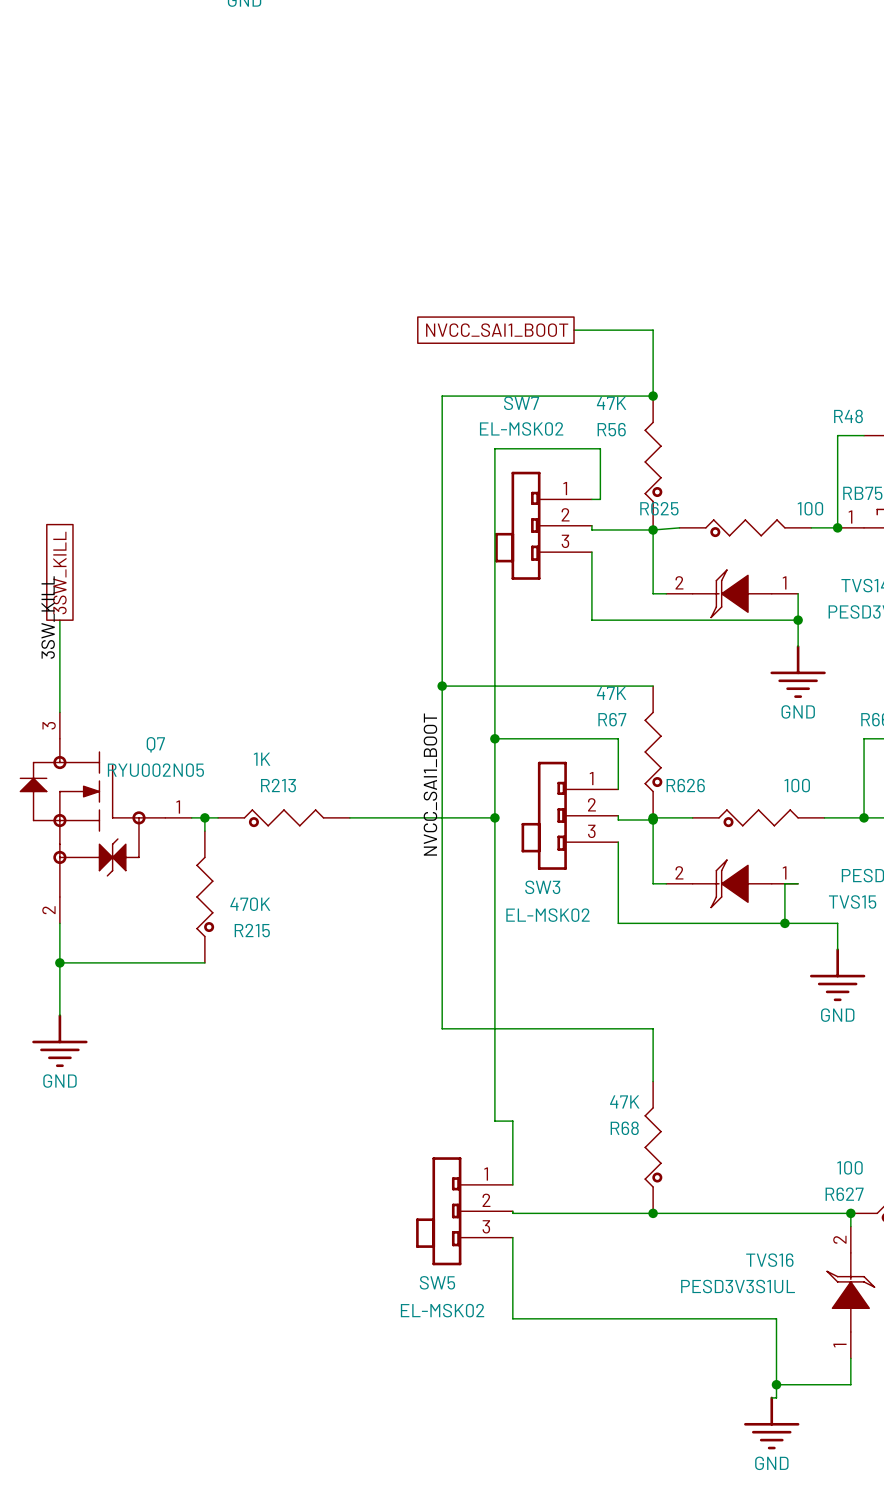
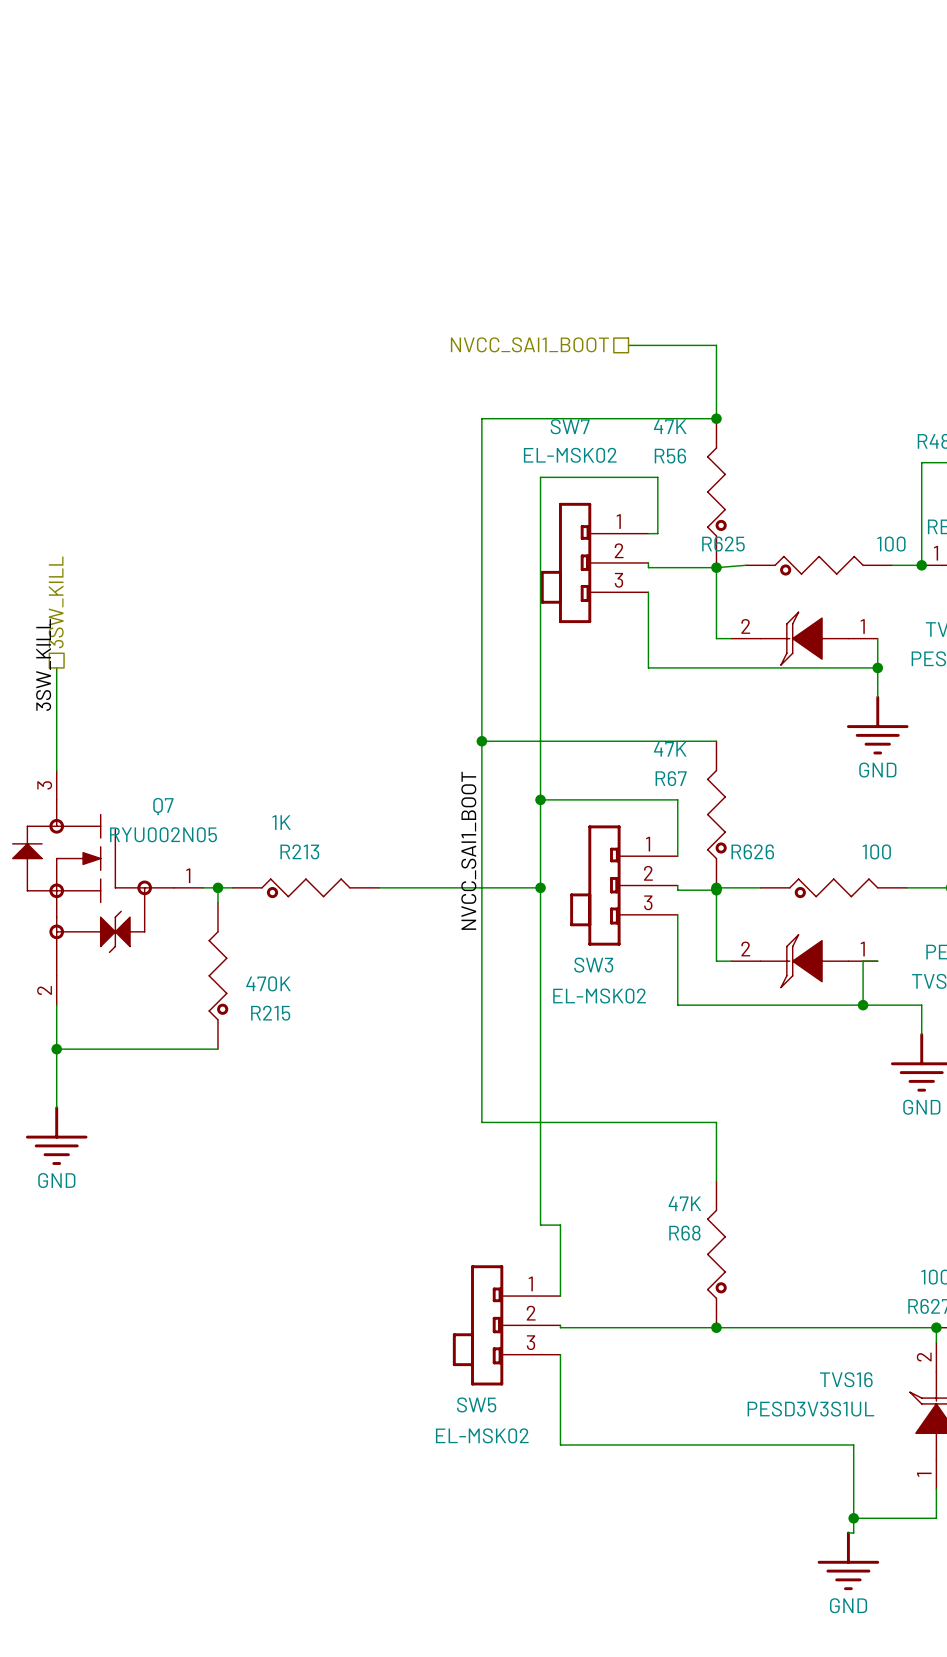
hierarchical label: none -> NVCC_SAI1_BOOT (529, 344)
global label: NVCC_SAI1_BOOT (497, 330) -> none
hierarchical label: none -> 3SW_KILL (56, 602)
global label: 3SW_KILL (59, 573) -> none

